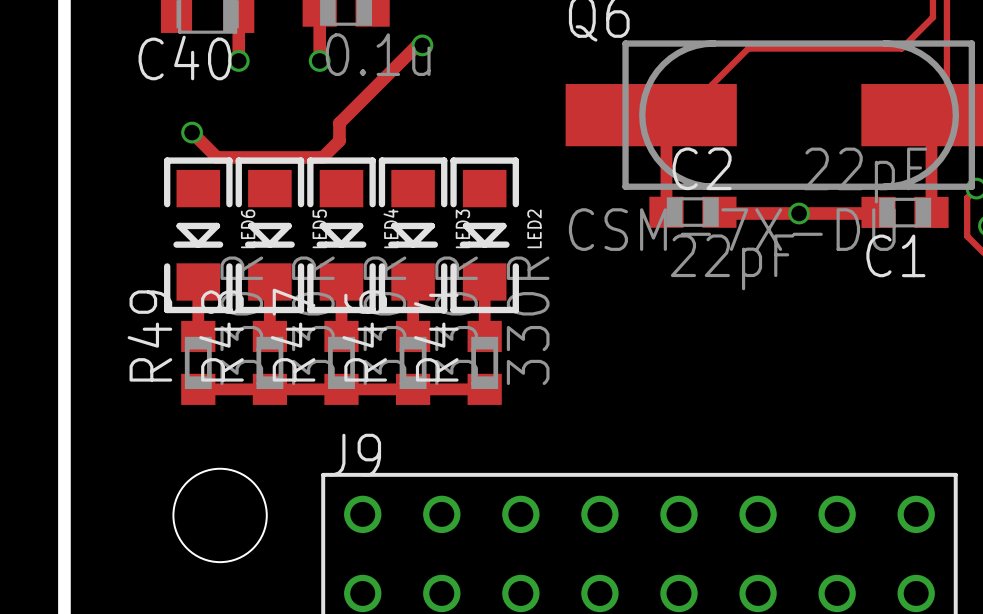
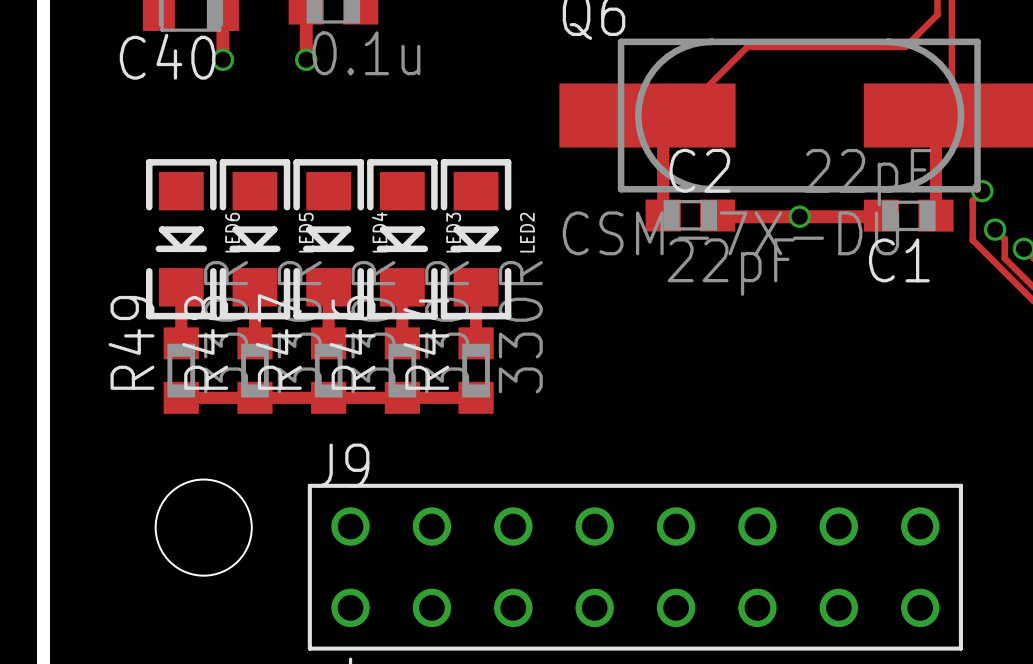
track: (422, 45) (417, 45) (339, 123) (339, 140) (322, 157) (216, 157) (192, 132) -> none
via: (422, 45) -> none
via: (192, 132) -> none

